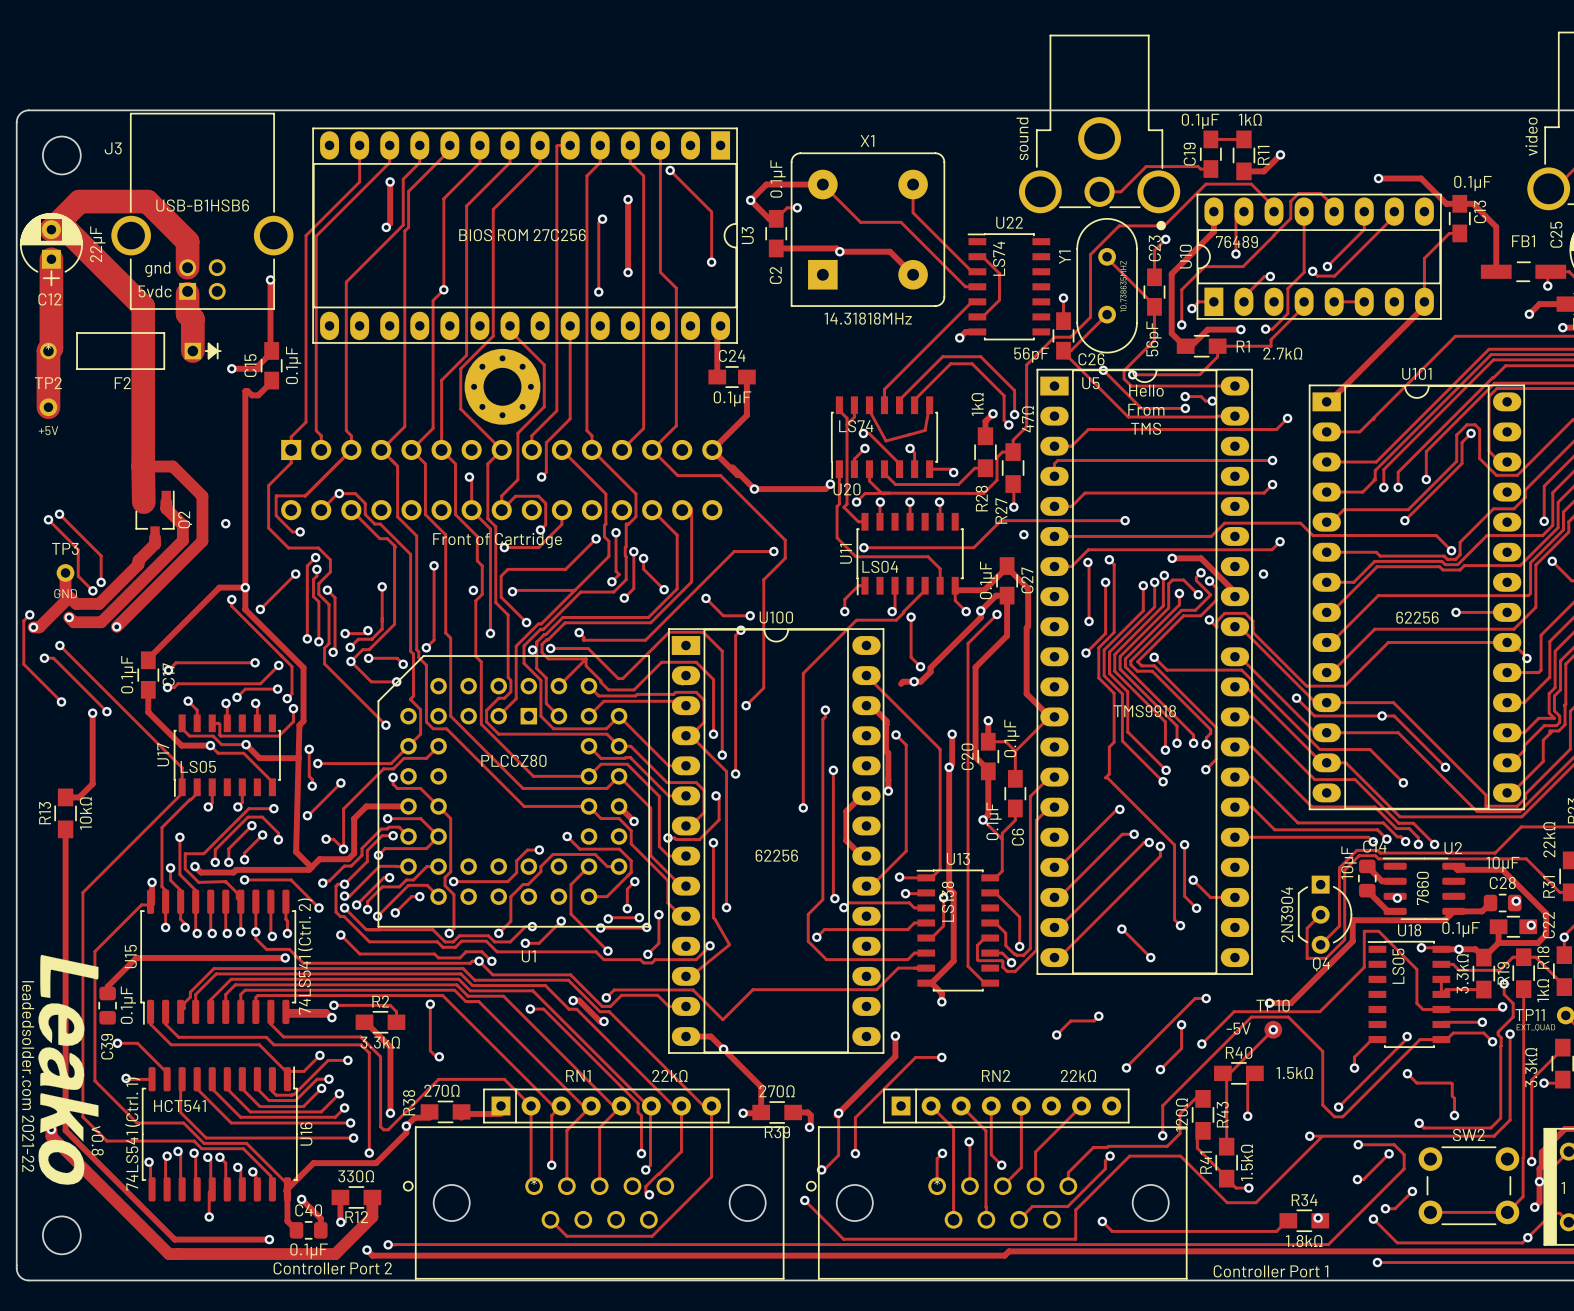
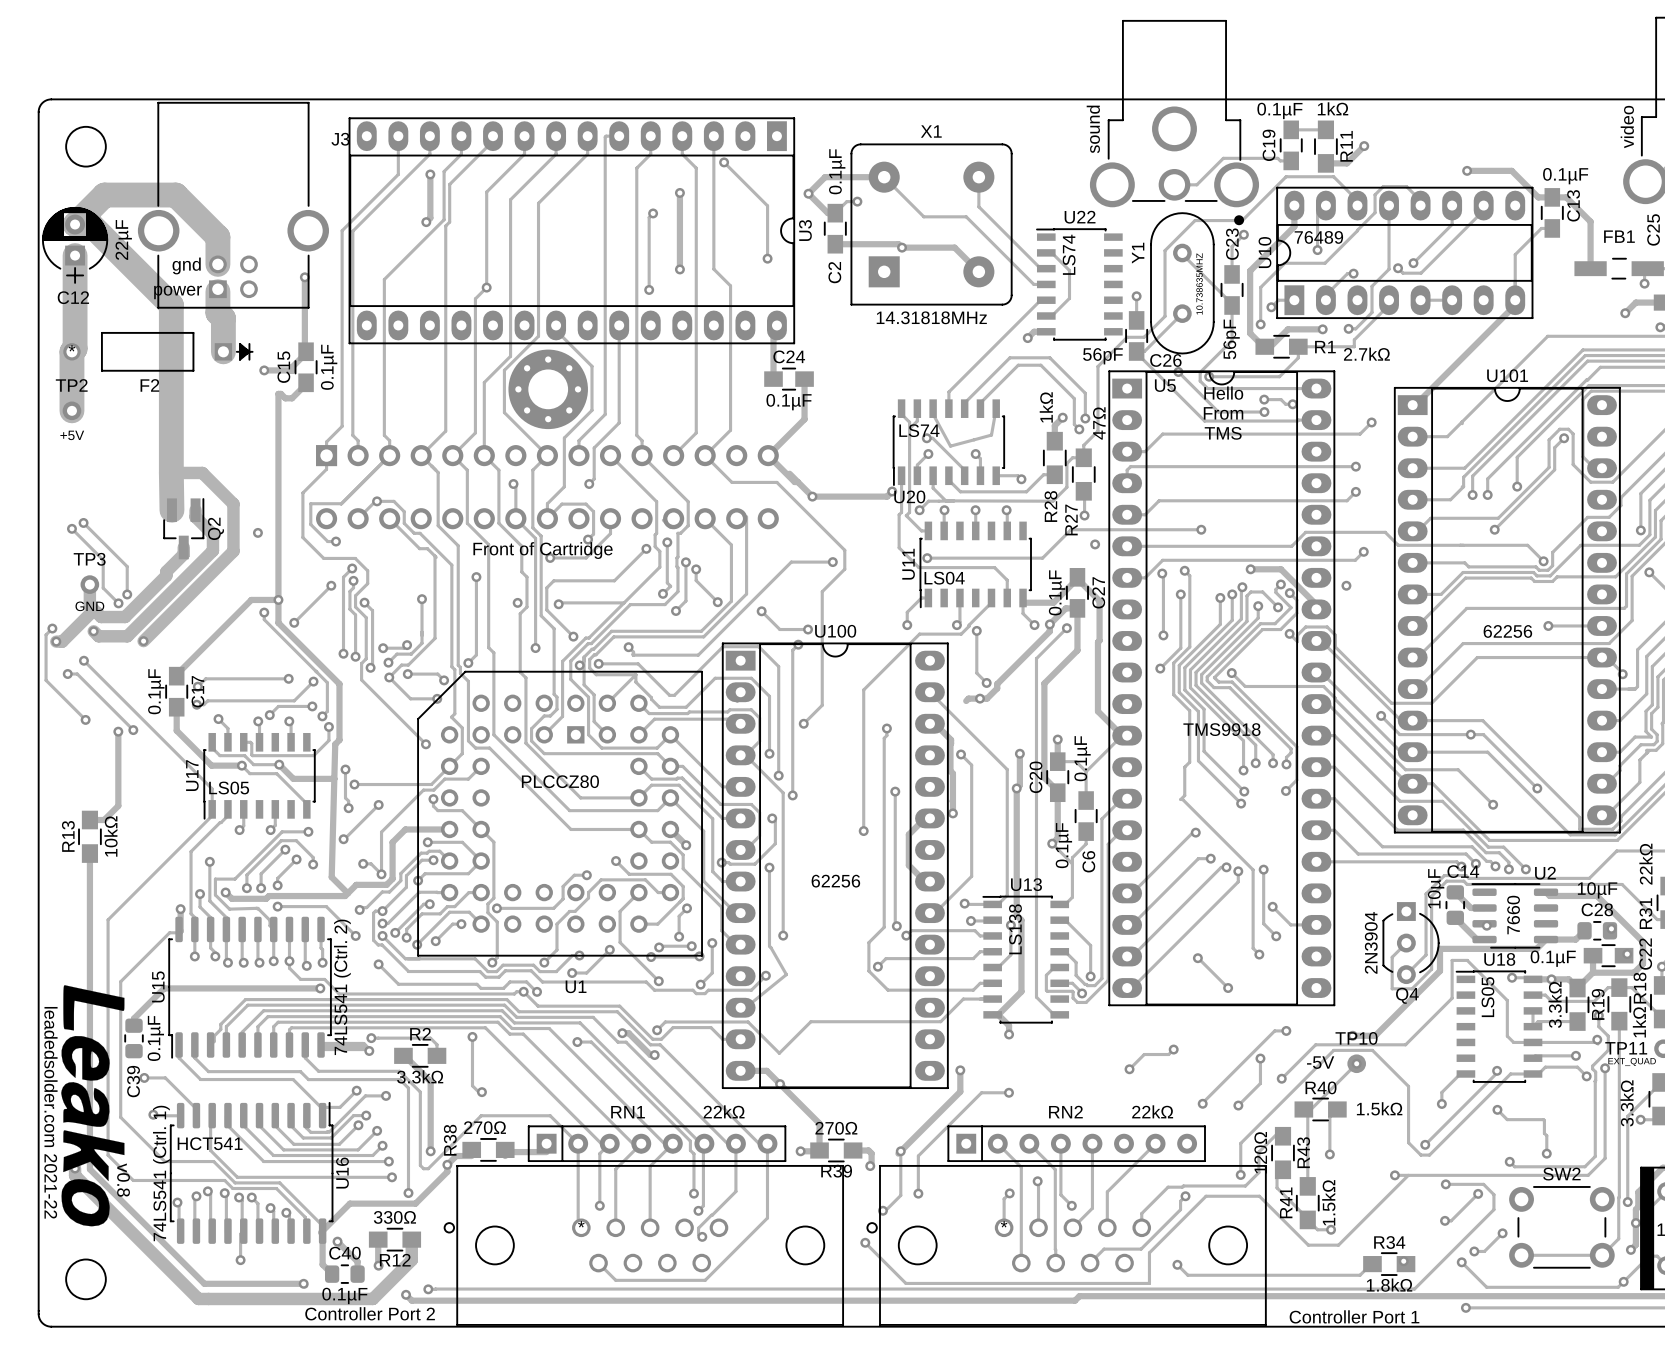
J3 name position: J3 (113, 148) -> J3 (340, 139)
J3 value: USB-B1HSB6 (202, 205) -> none
U3 value: BIOS ROM 27C256 (522, 235) -> none
text: 5vdc (155, 291) -> power (177, 292)

